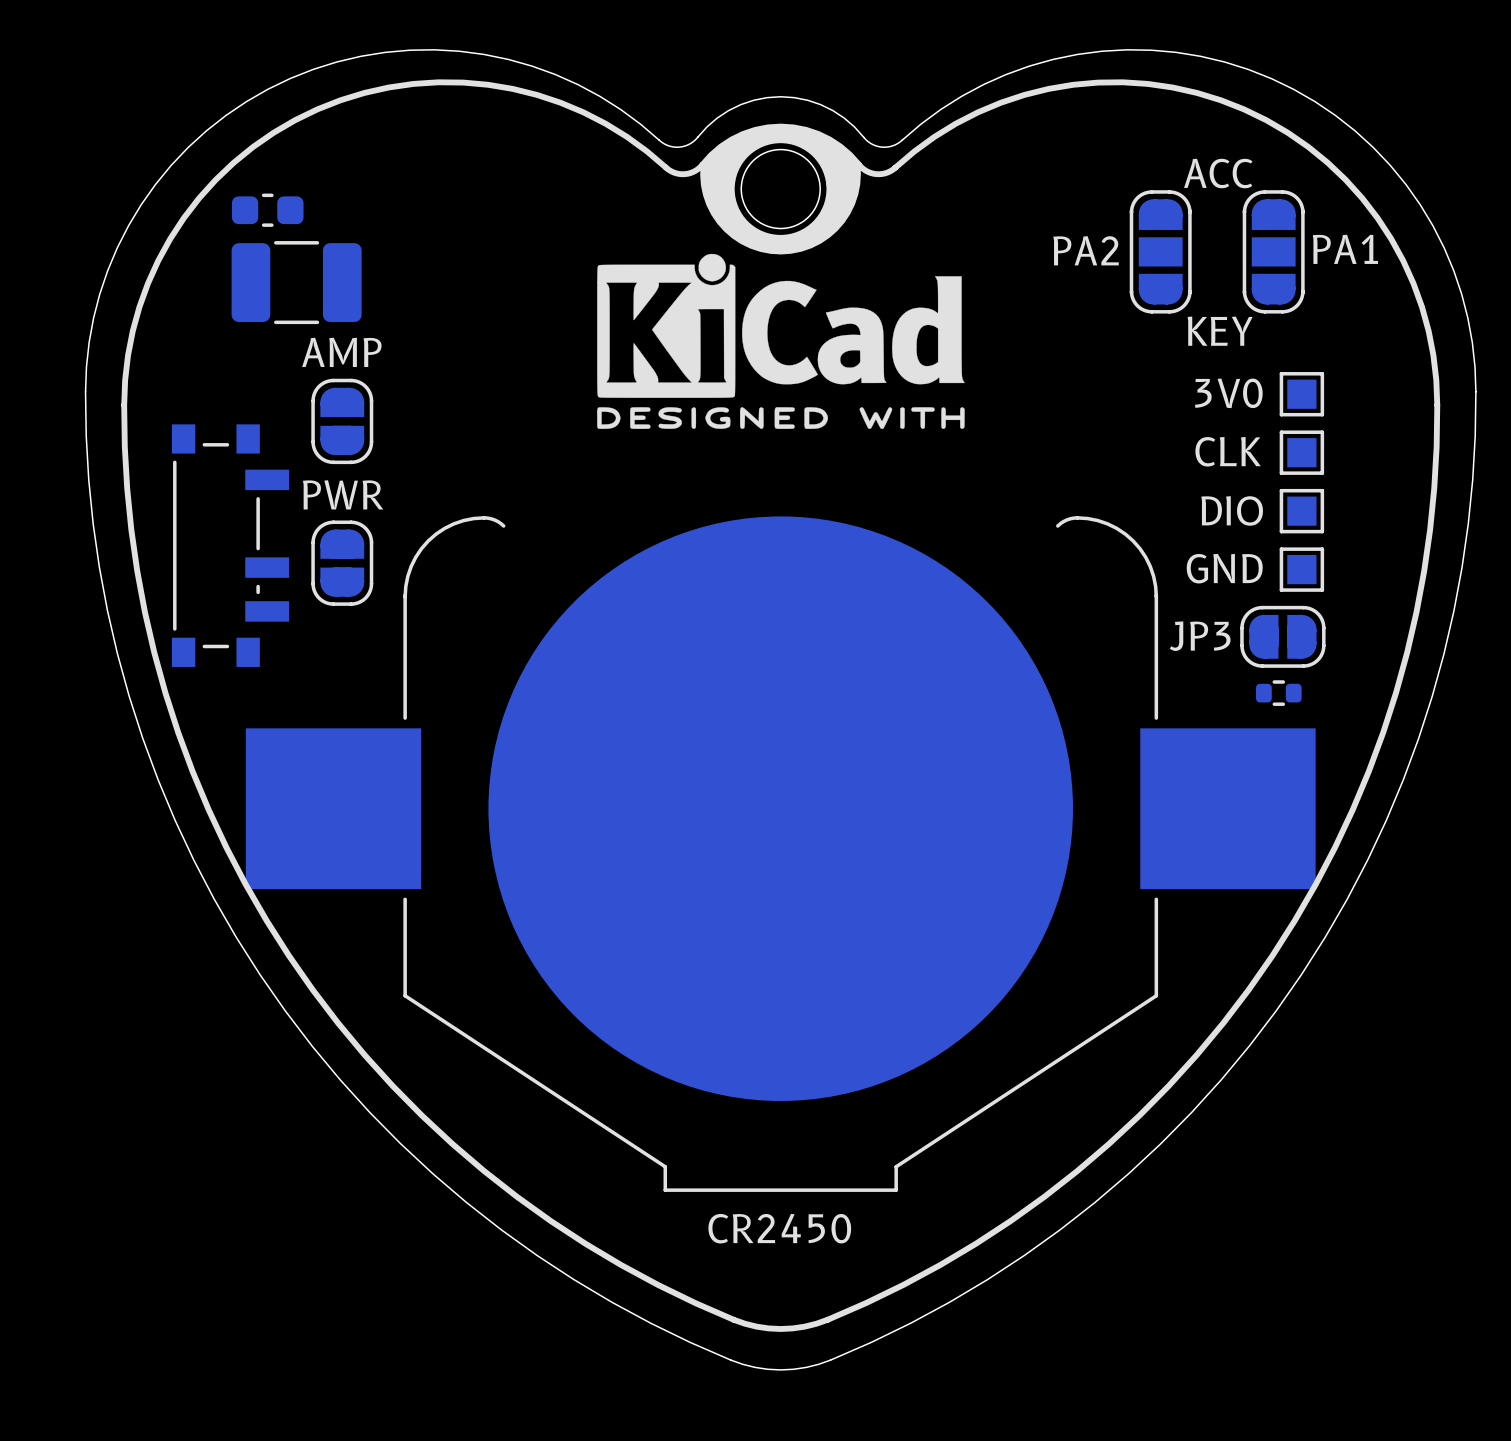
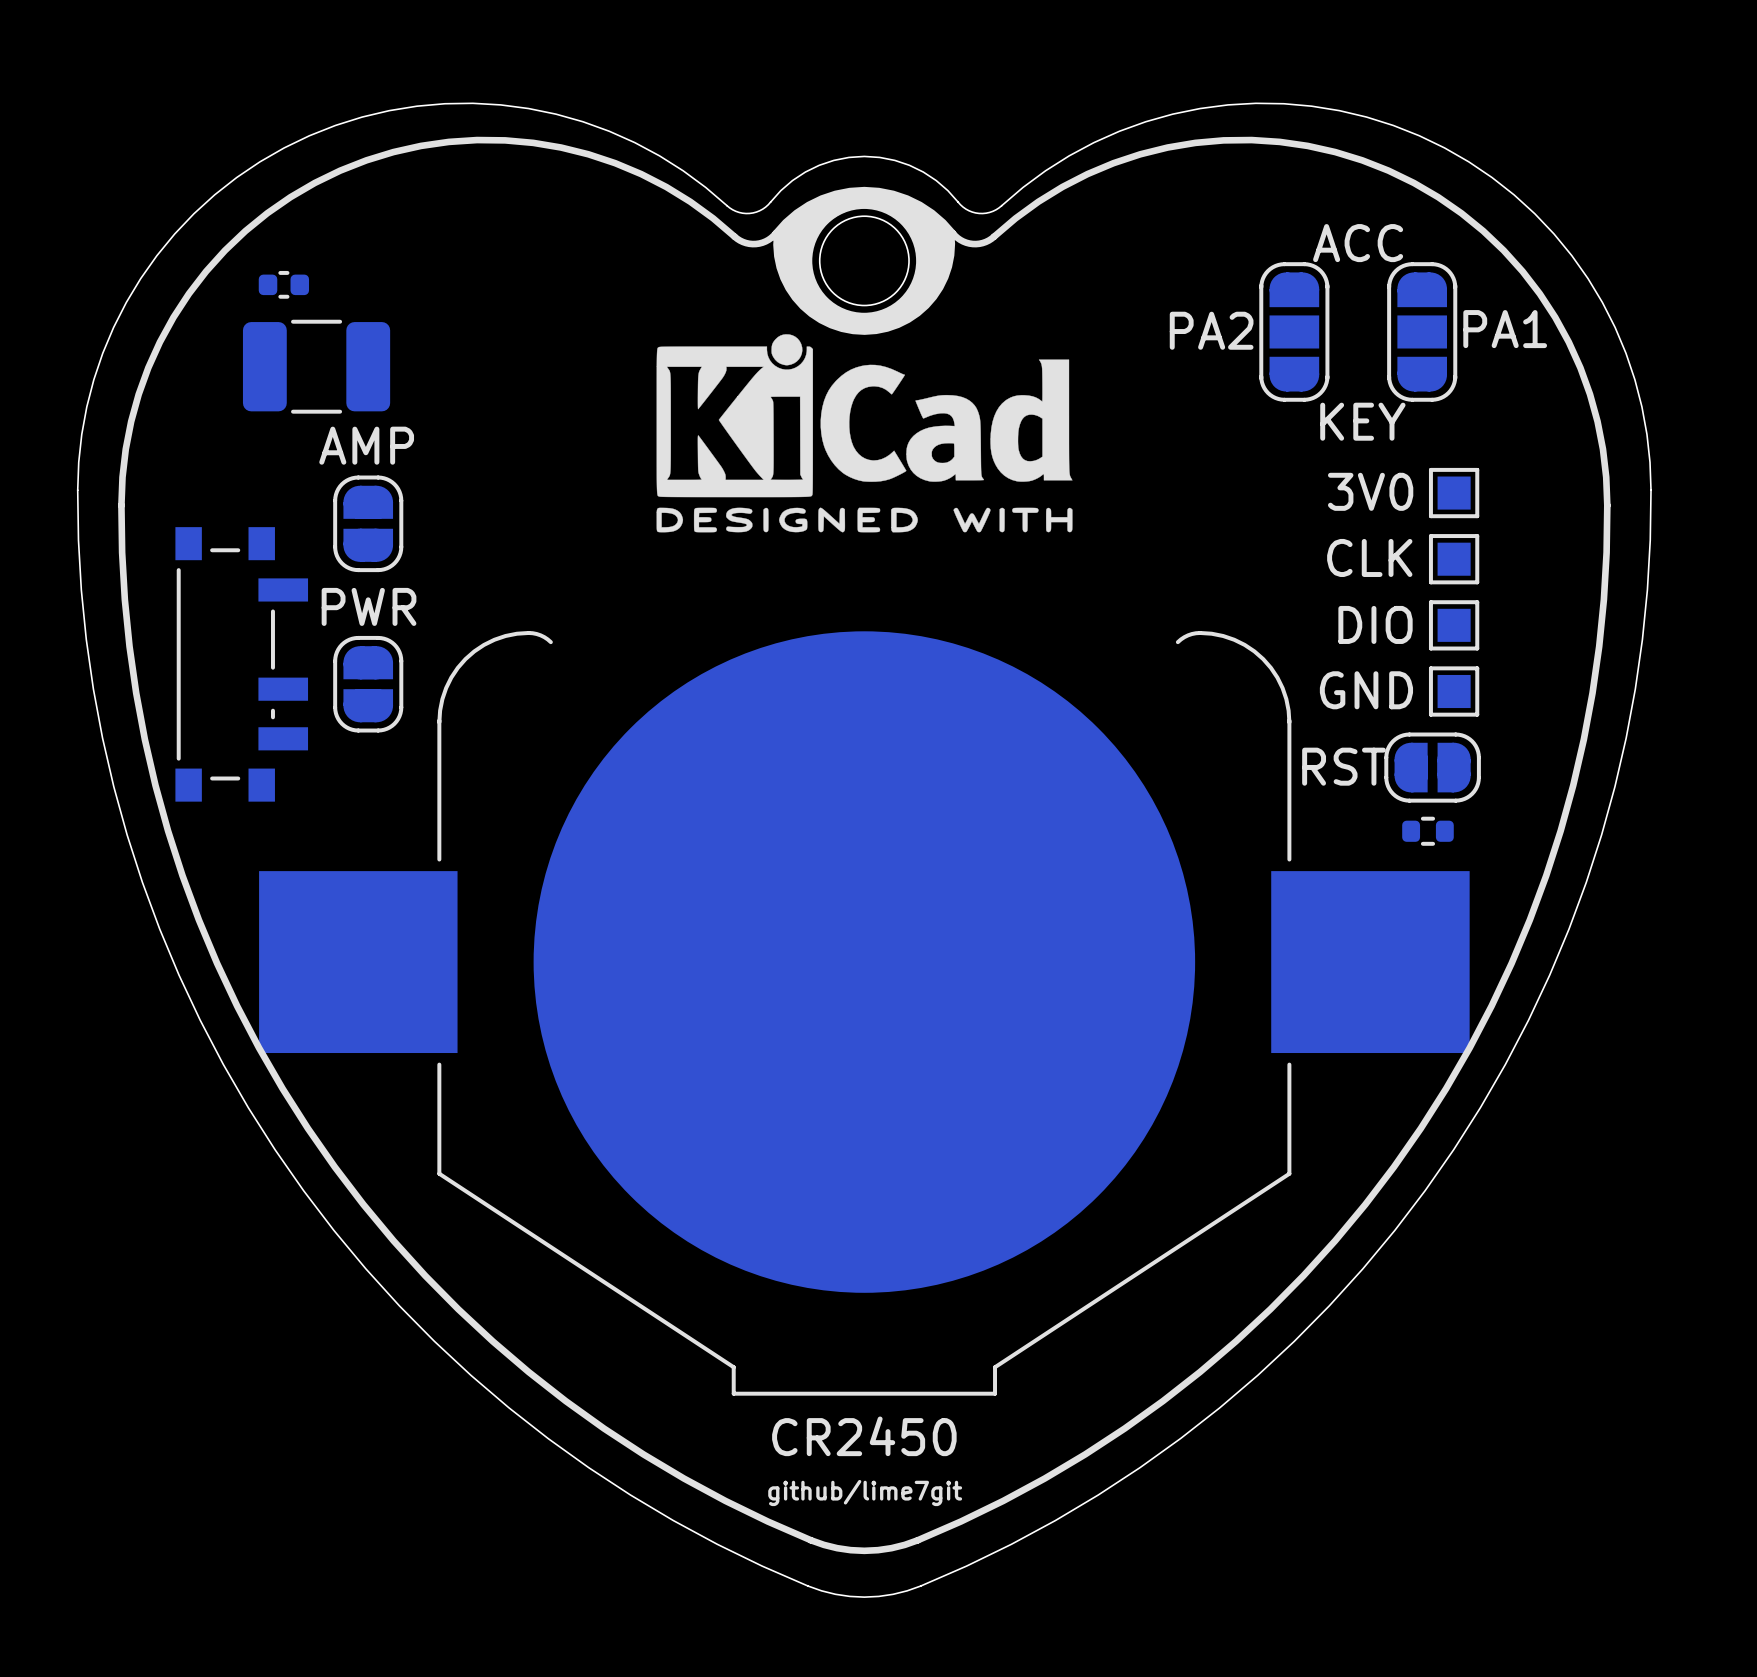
part footprint: [231, 193, 304, 227] -> [258, 270, 310, 299]
JP3 name: JP3 (1200, 636) -> RST (1344, 766)
text: none -> github/lime7git (865, 1493)

